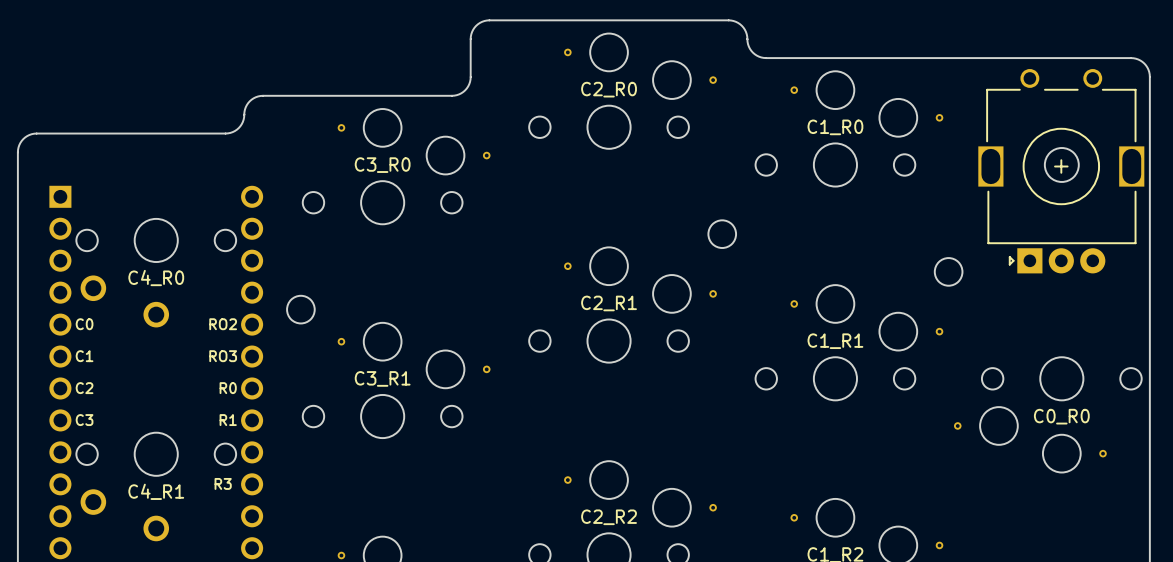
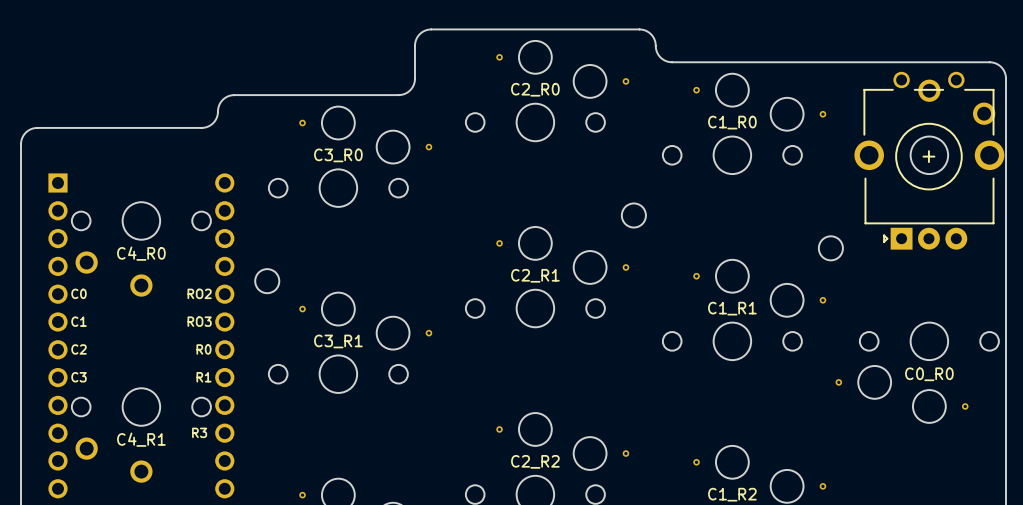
part footprint: [978, 69, 1145, 274] -> [854, 71, 1005, 250]

